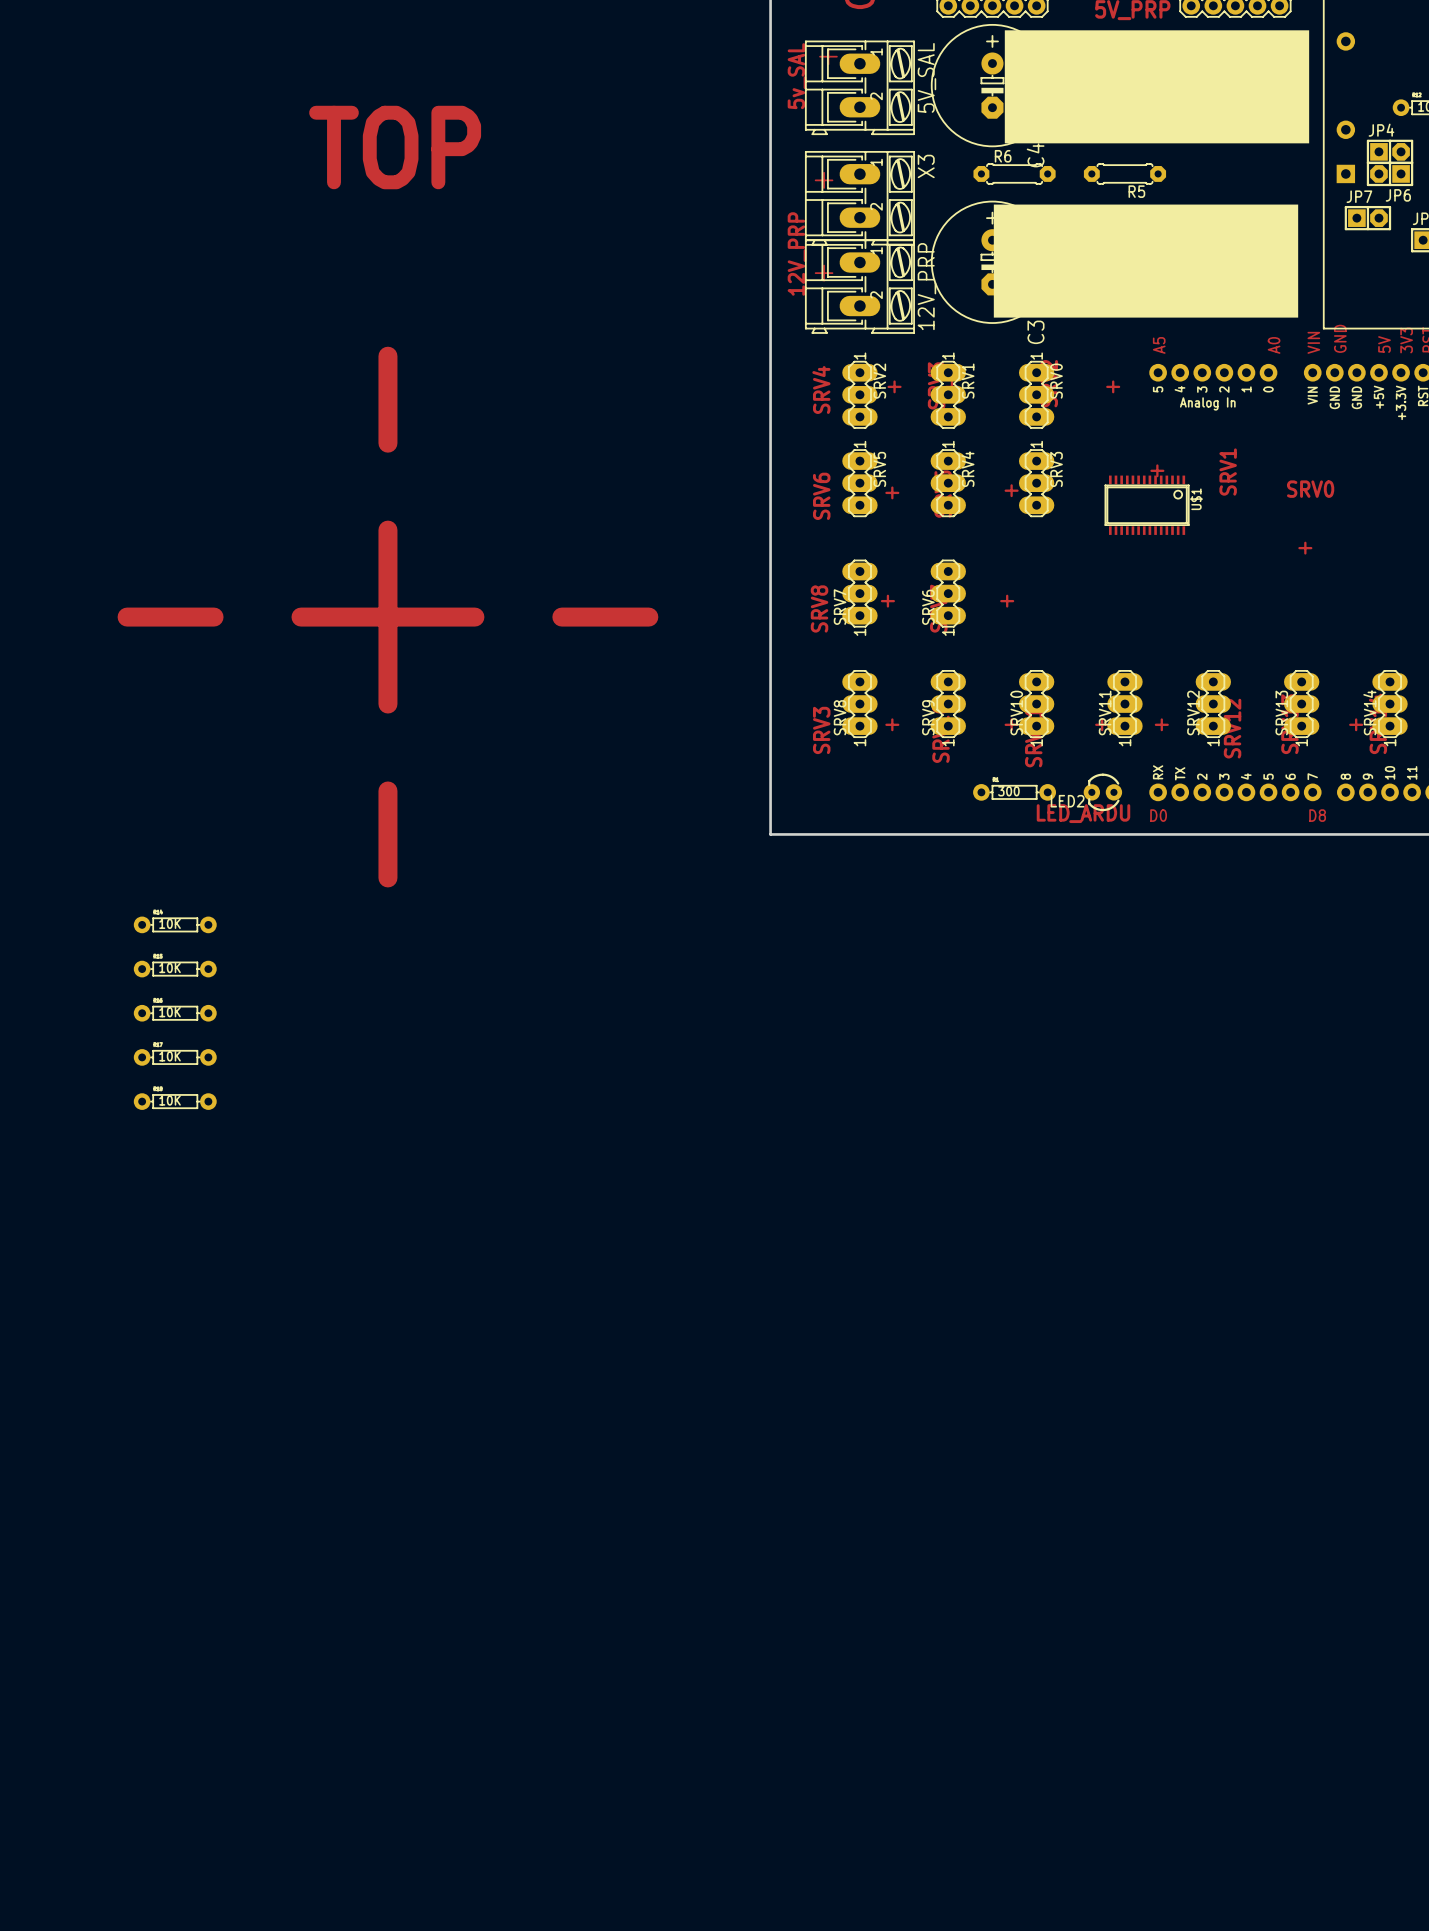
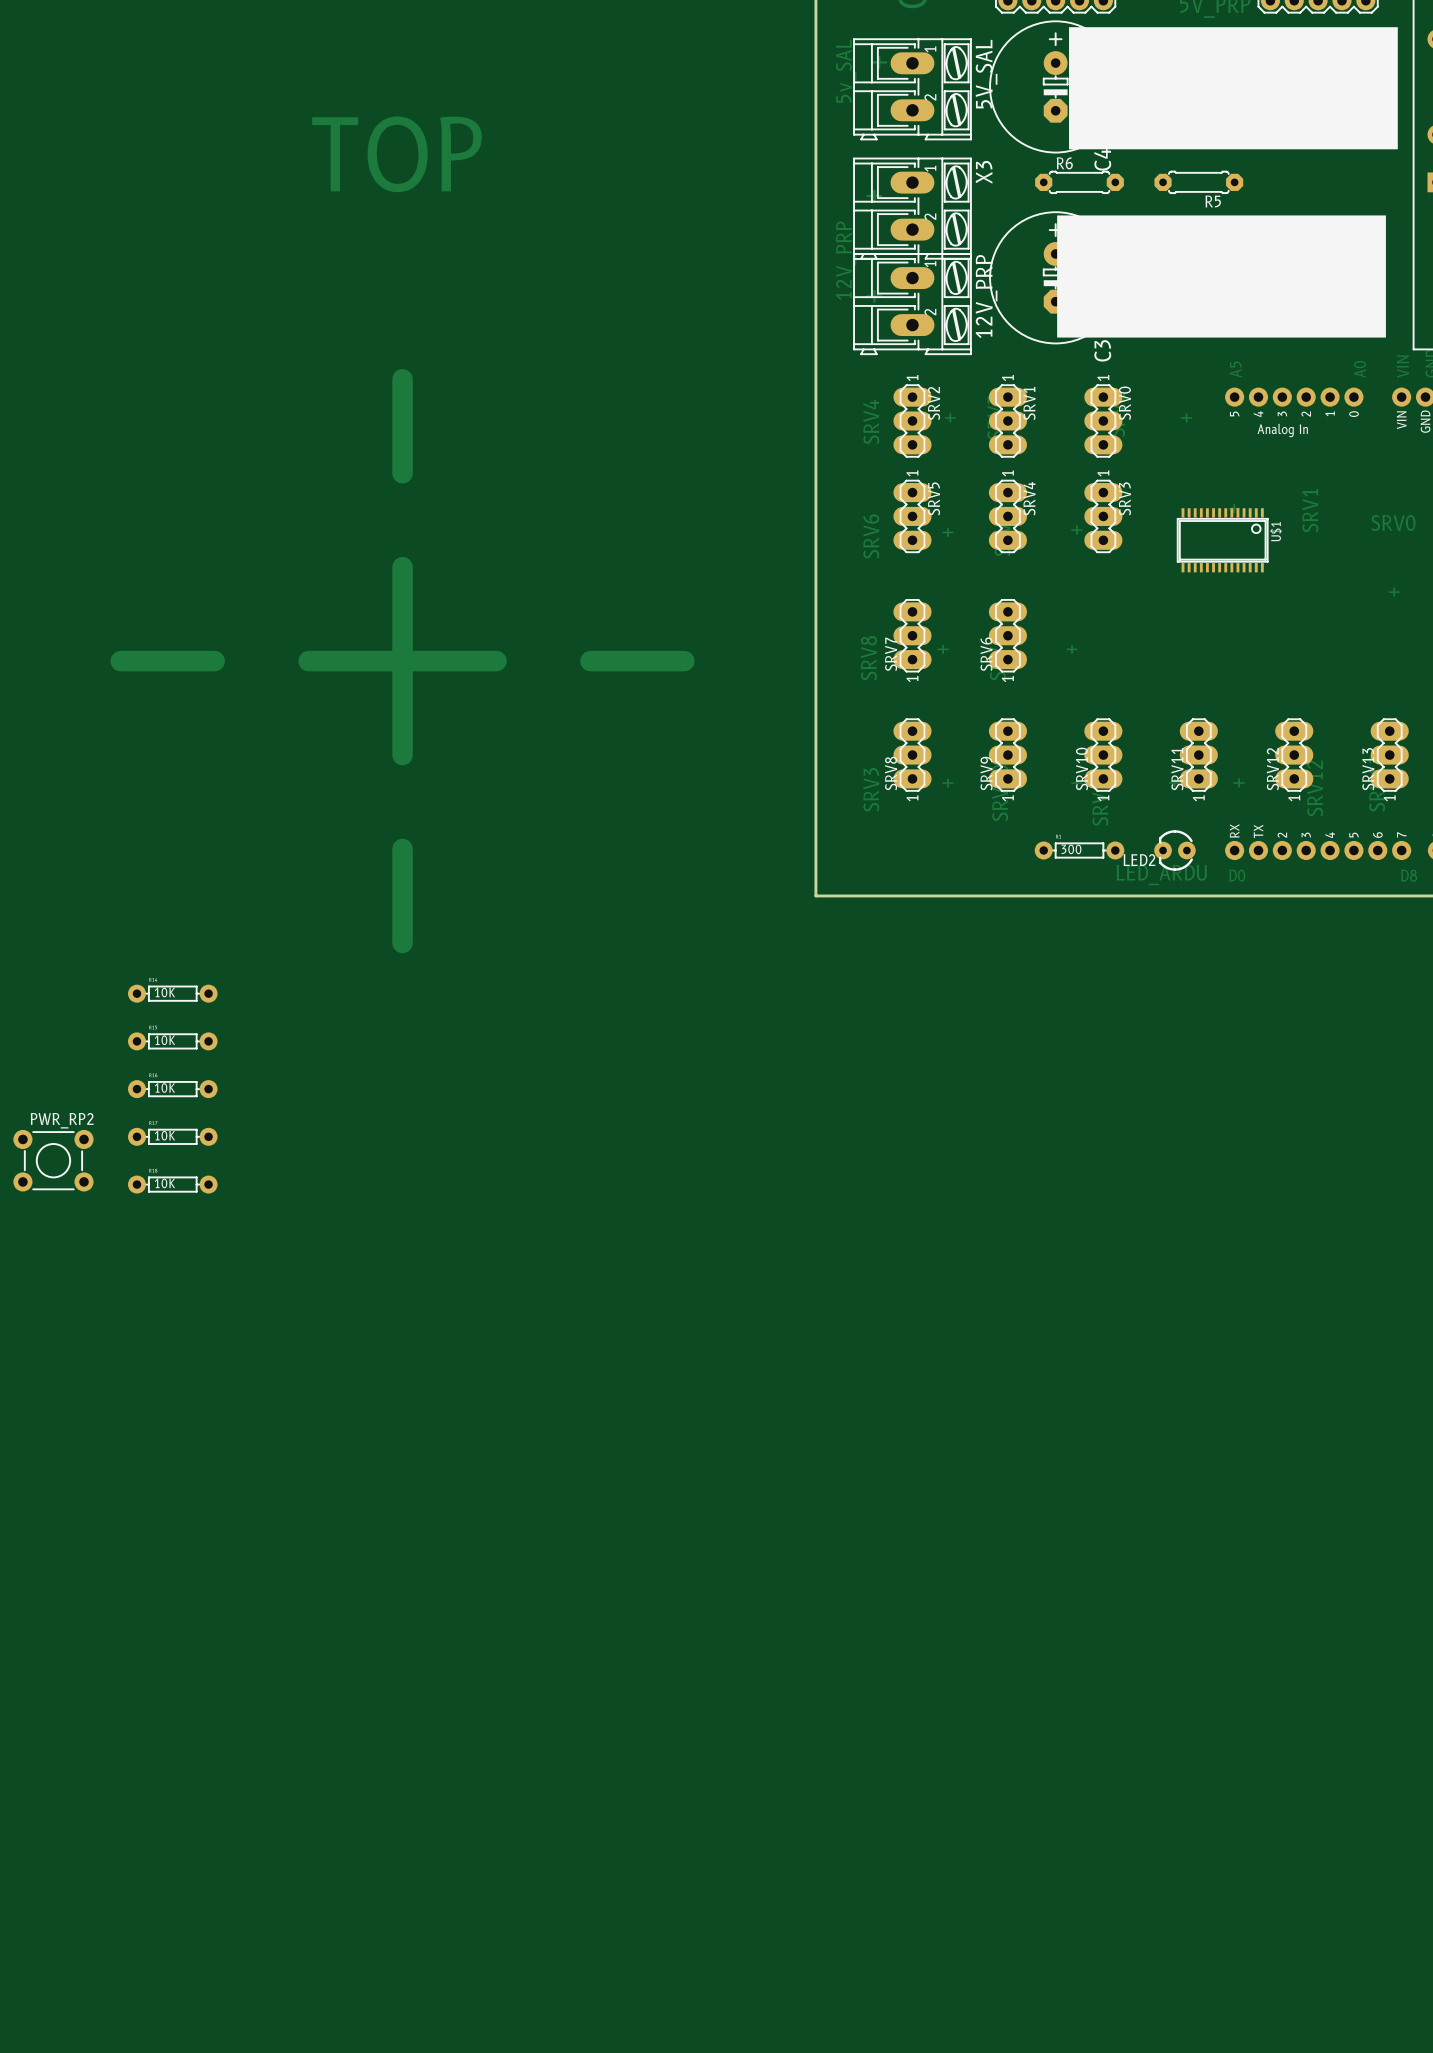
PWR_RP2: none -> (53, 1160)

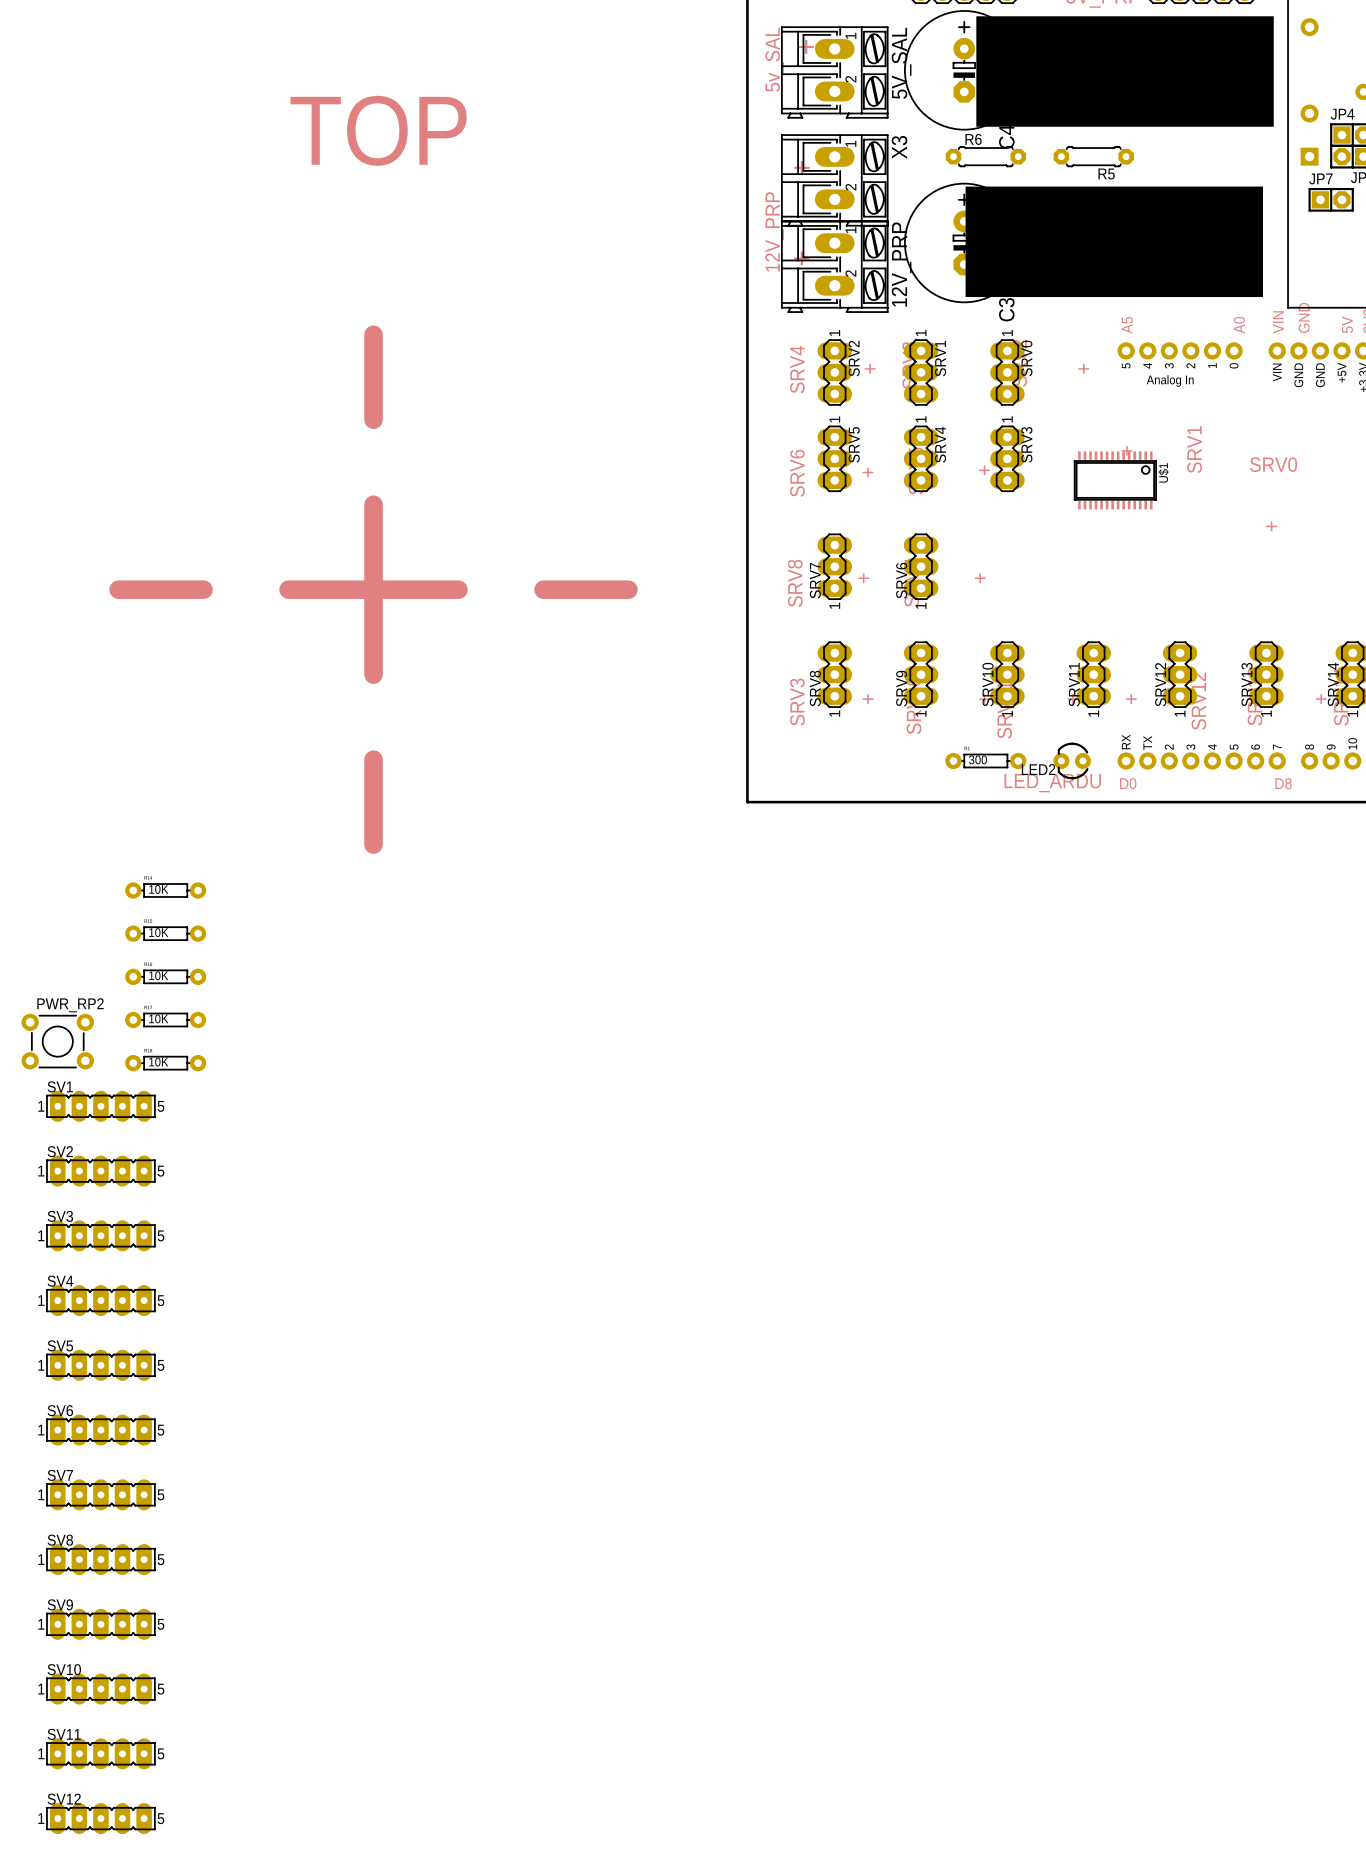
SV1: none -> (100, 1106)
SV2: none -> (100, 1171)
SV3: none -> (100, 1235)
SV4: none -> (100, 1300)
SV5: none -> (100, 1365)
SV6: none -> (100, 1430)
SV7: none -> (100, 1494)
SV8: none -> (100, 1559)
SV9: none -> (100, 1624)
SV10: none -> (100, 1689)
SV11: none -> (100, 1753)
SV12: none -> (100, 1818)

